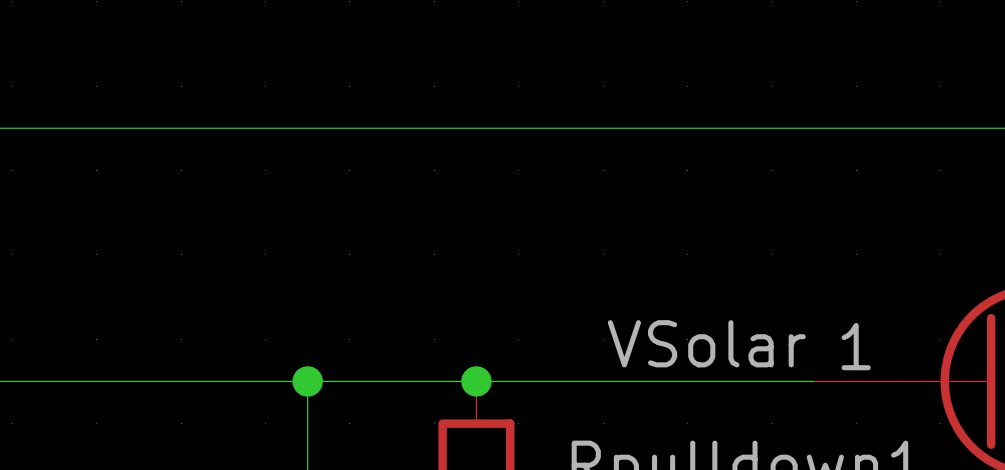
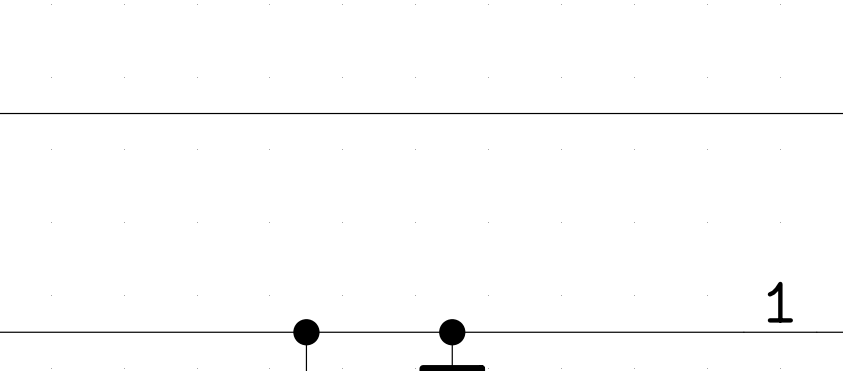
label: VSolar (706, 343) -> none

